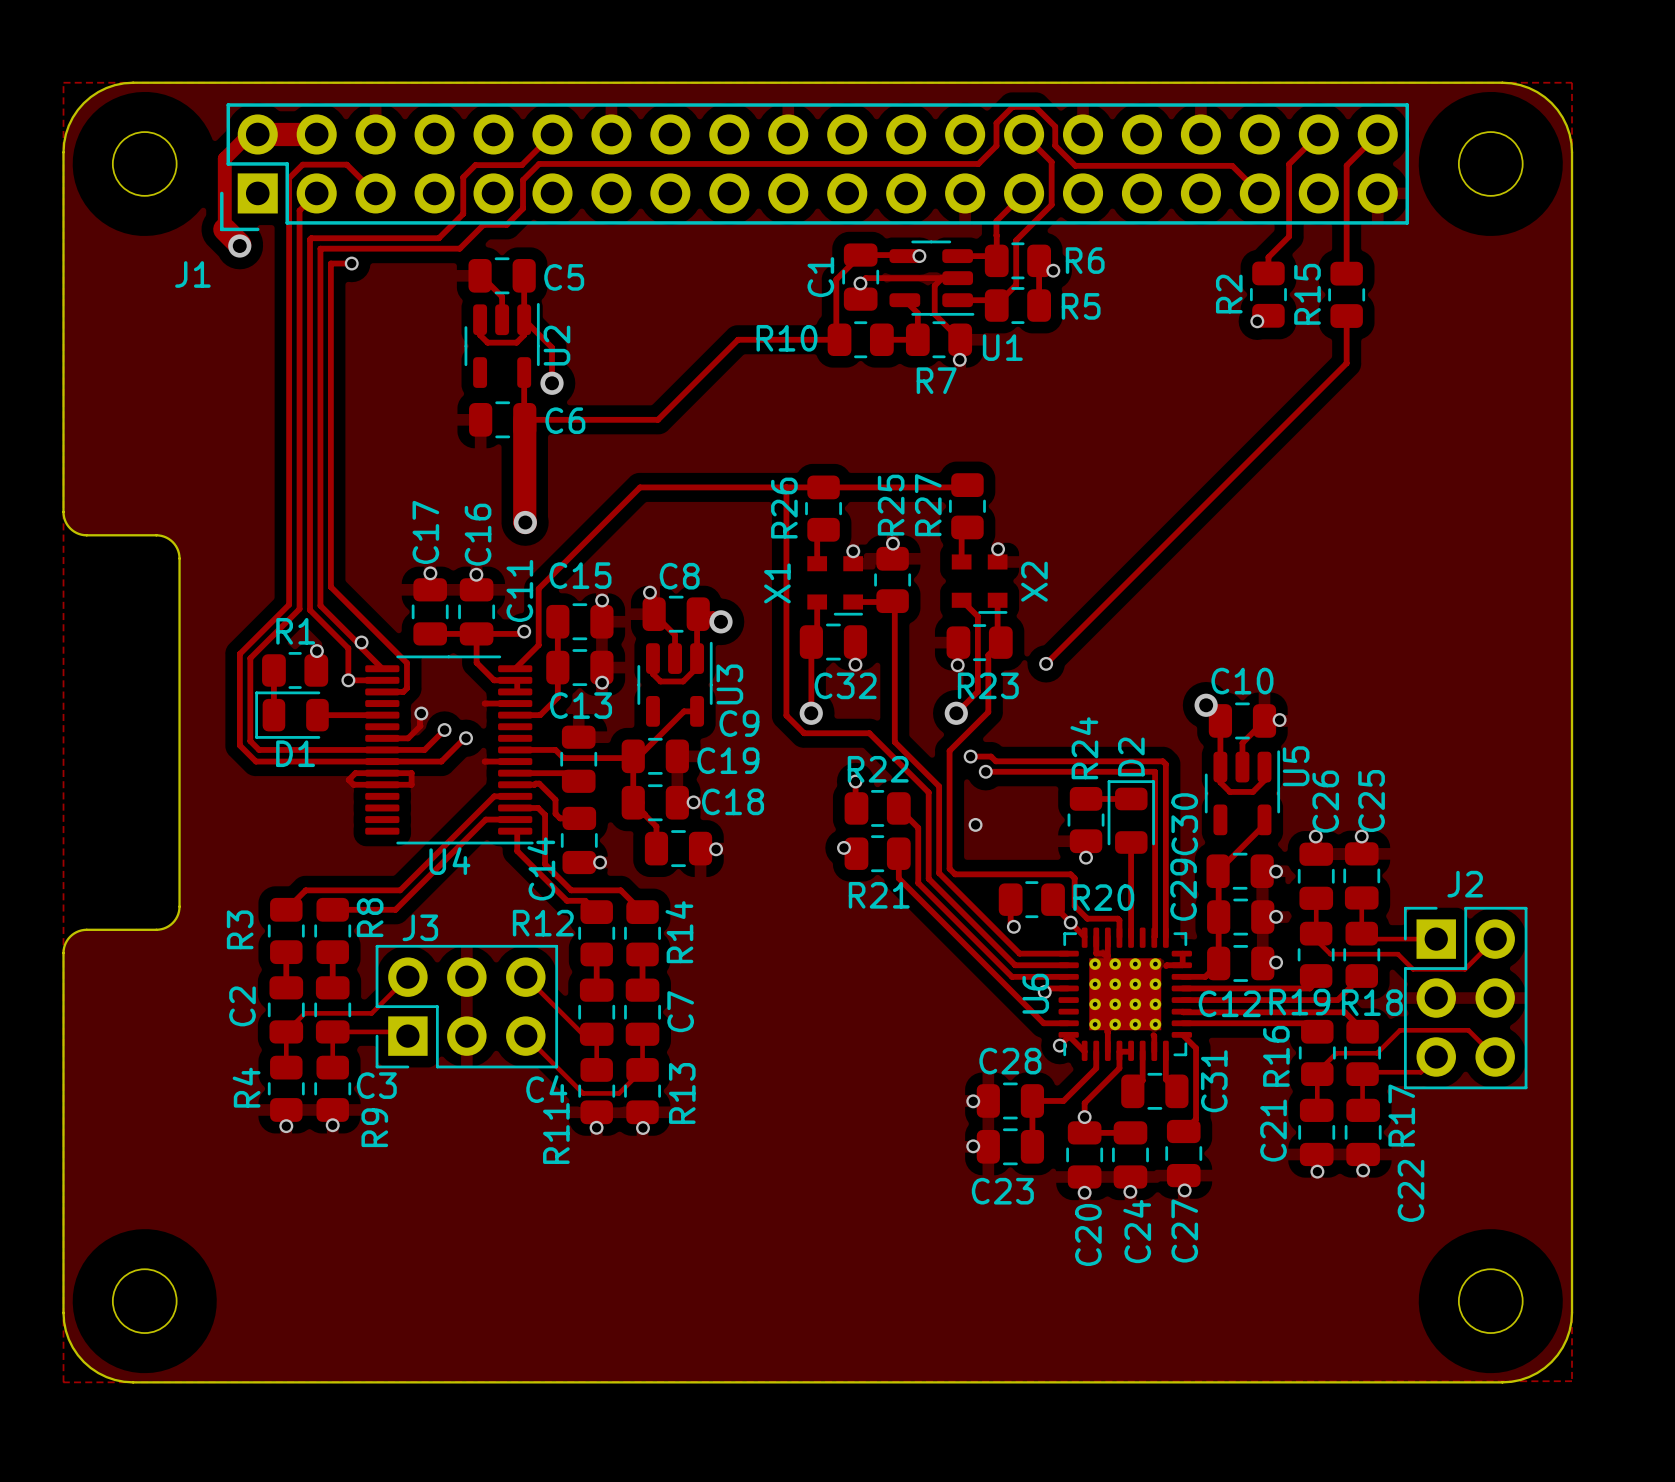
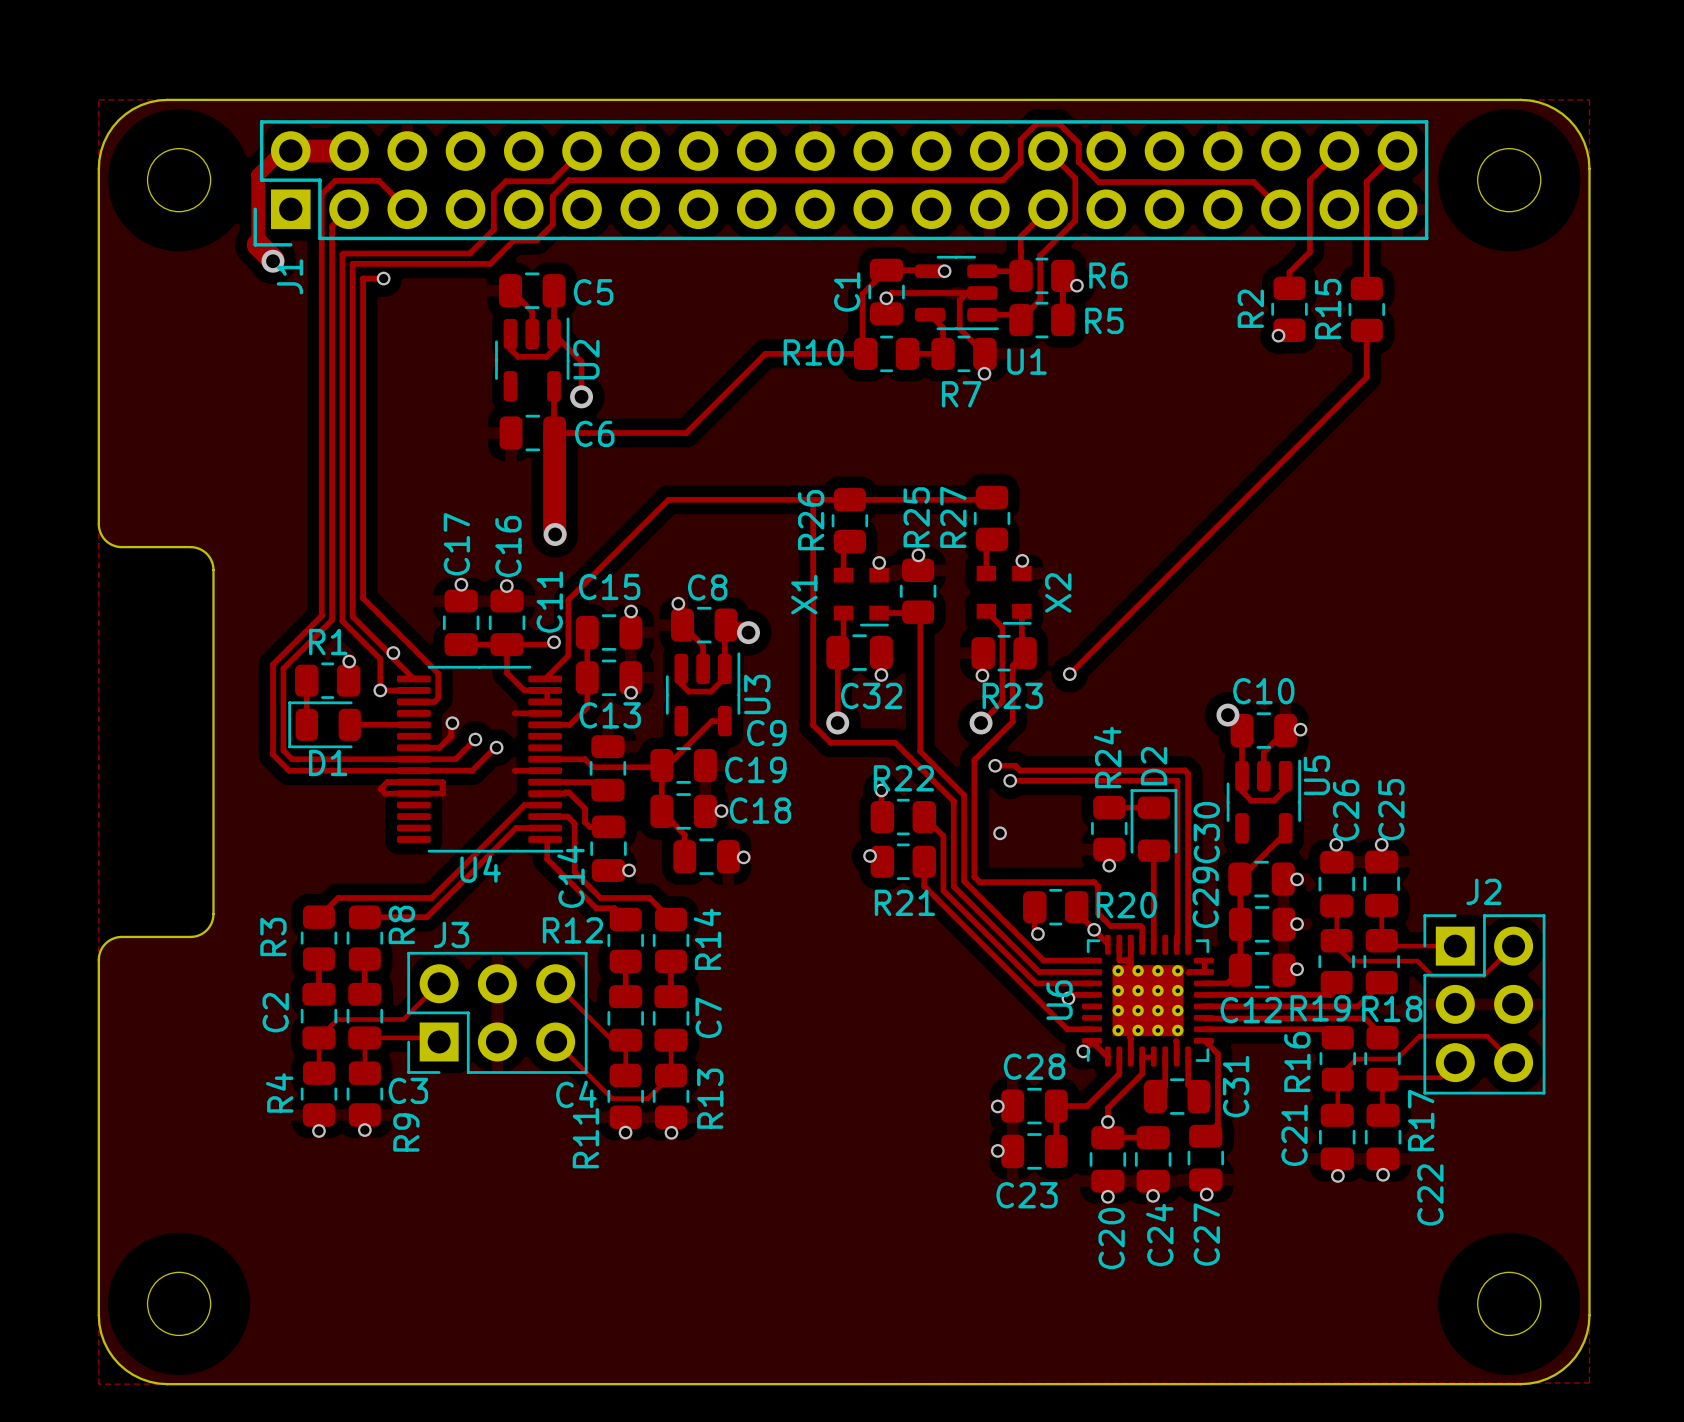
J1 name rotation: 0° (192, 274) -> 90° counterclockwise (289, 276)
J1 name position: J1 (192, 274) -> J1 (289, 276)

